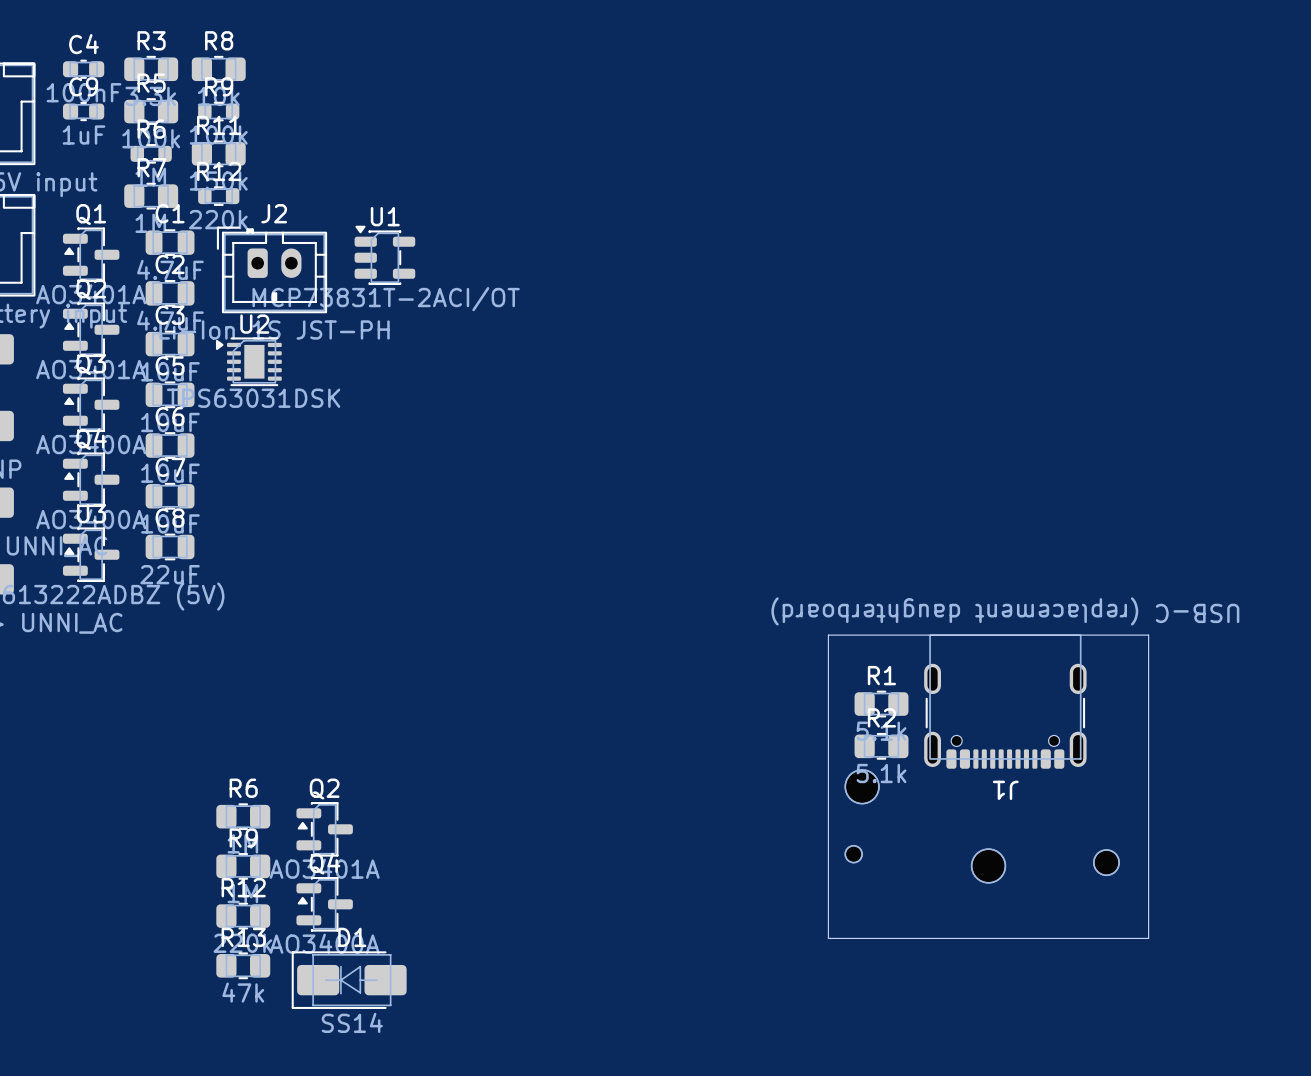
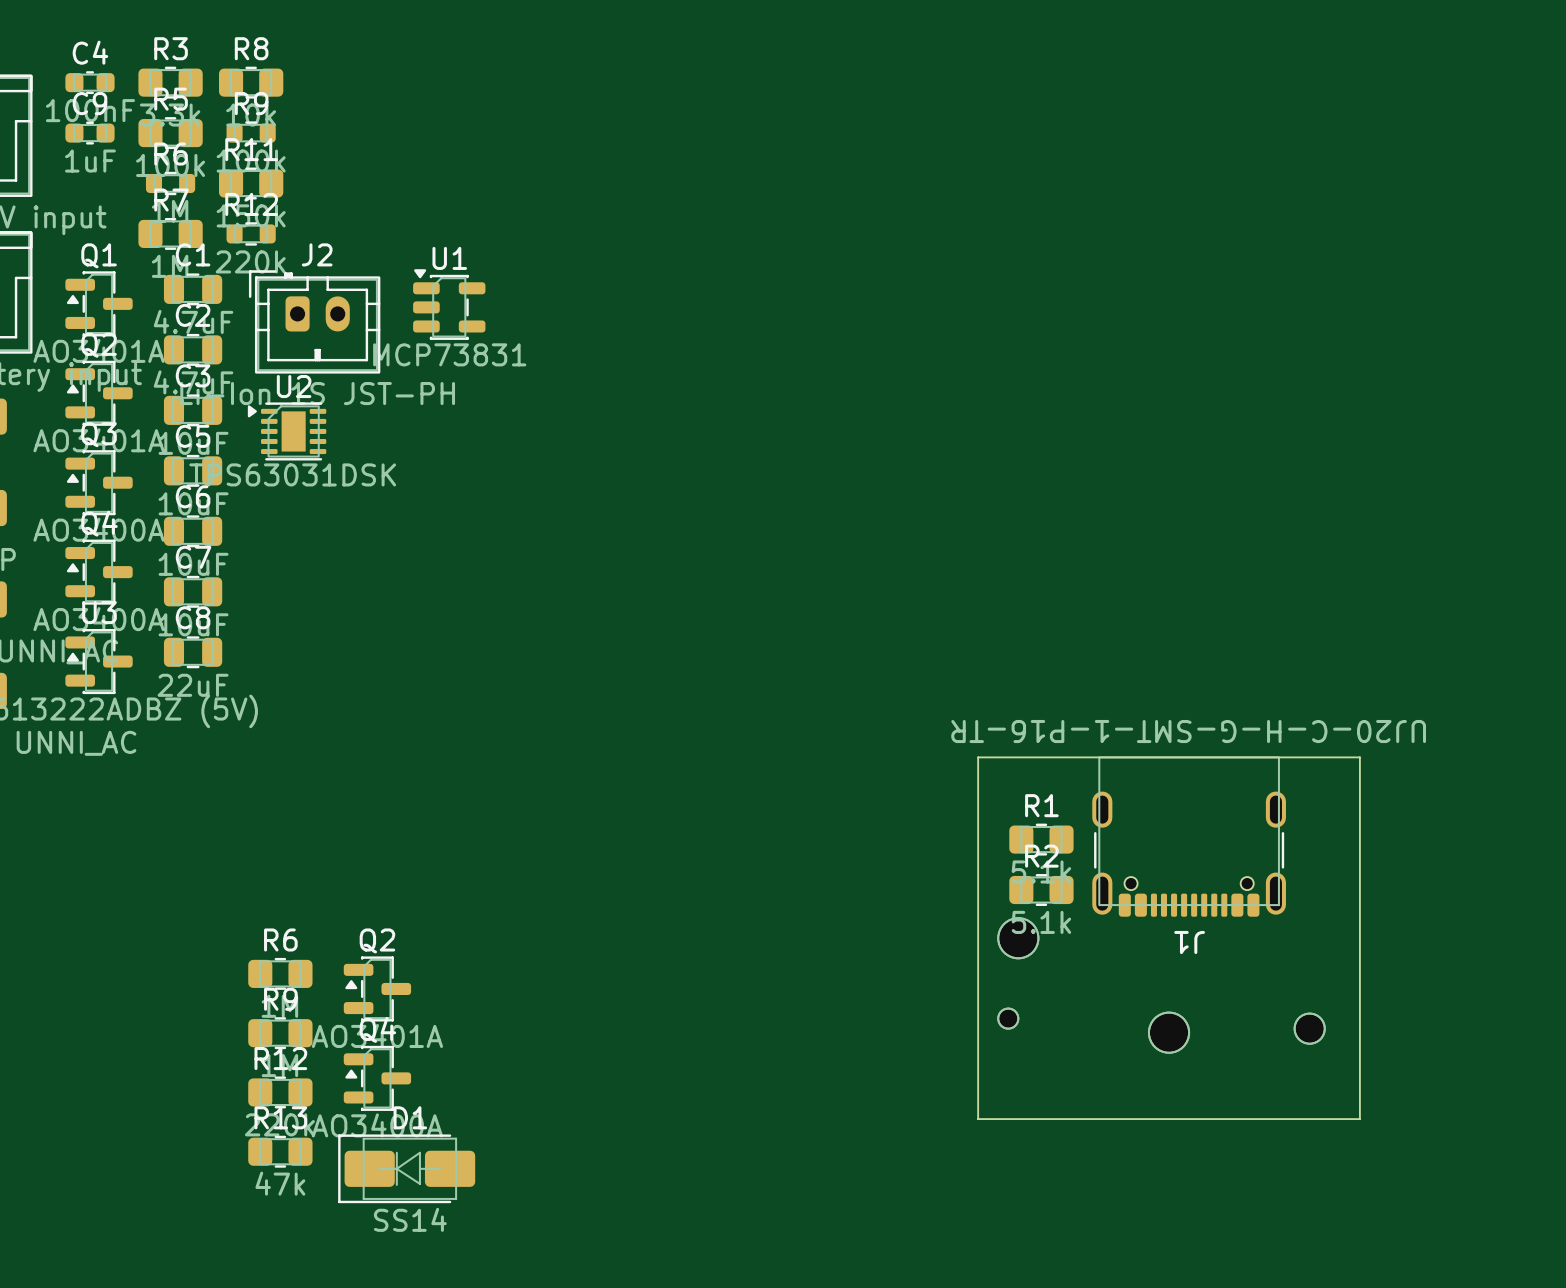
U1 value: MCP73831T-2ACI/OT (386, 299) -> MCP73831 (449, 354)
J1 value: USB-C (replacement daughterboard) (1005, 611) -> UJ20-C-H-G-SMT-1-P16-TR (1188, 731)

